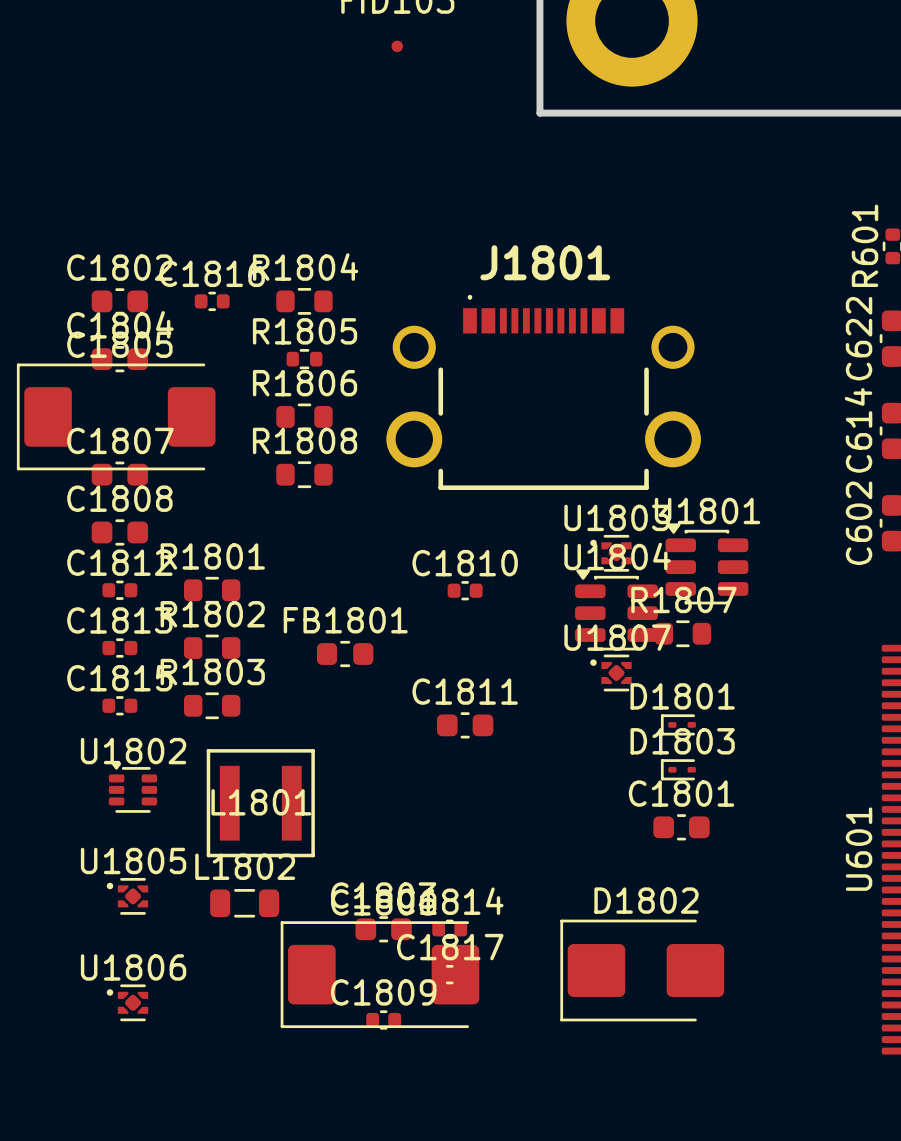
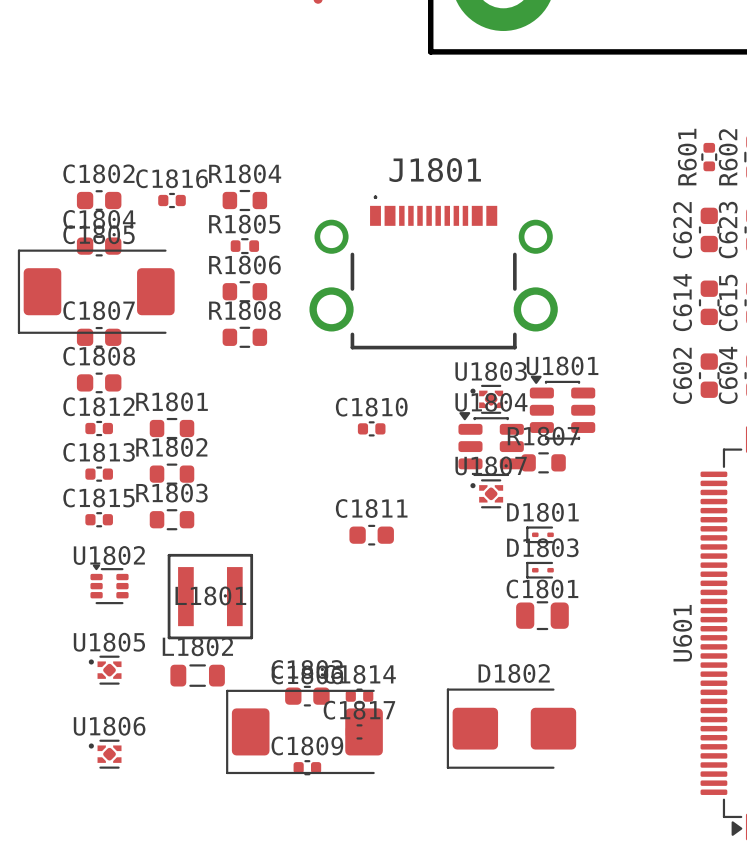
FB1801: (345, 654) -> none
C1801 footprint: [653, 814, 710, 841] -> [516, 601, 569, 631]

